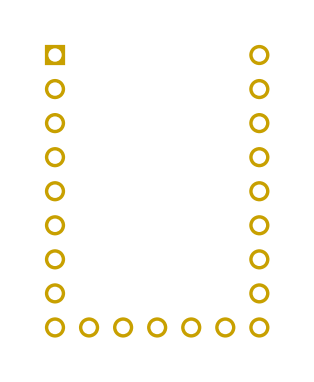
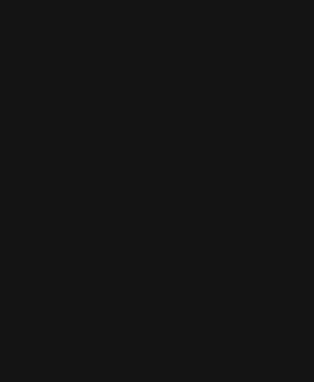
part: (157, 191) -> none

